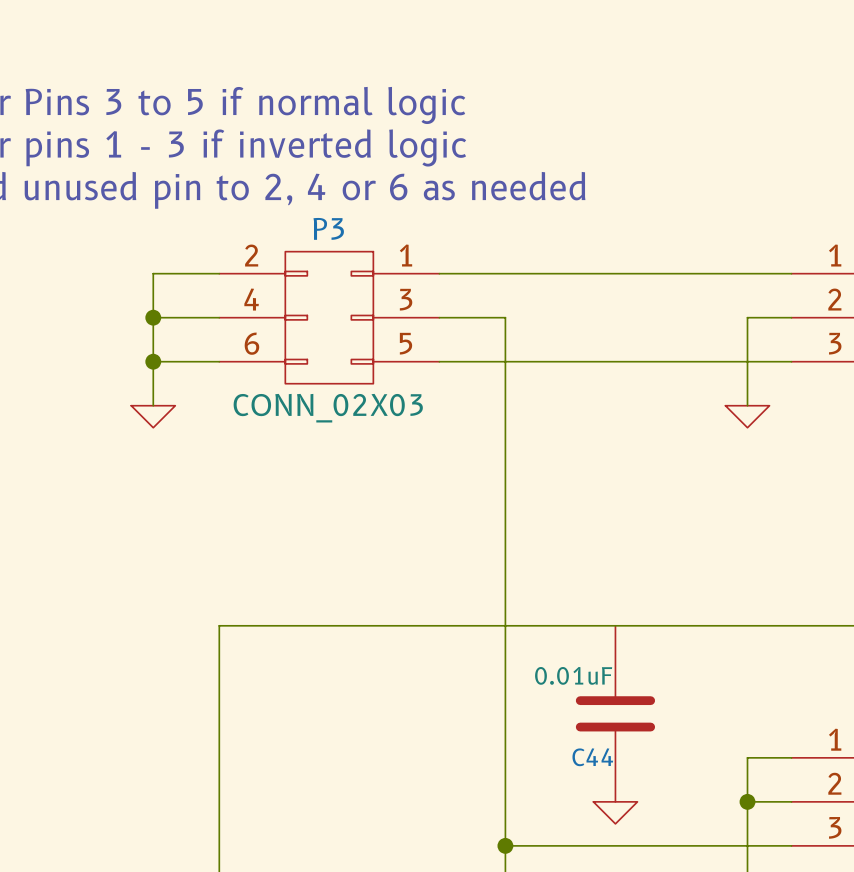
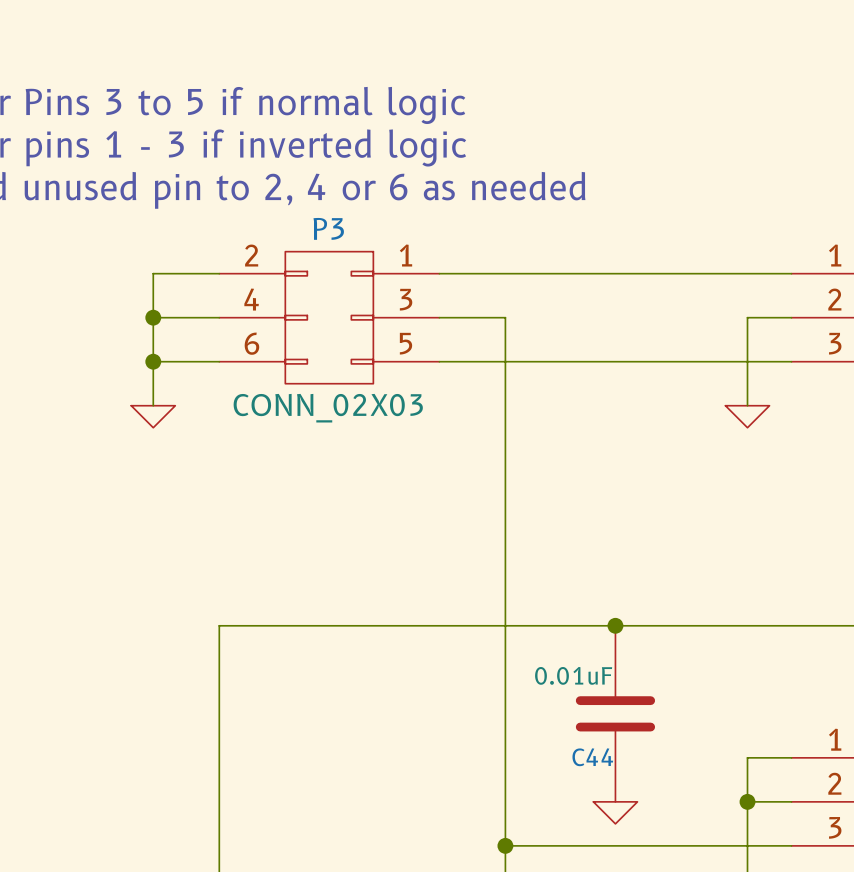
junction: none -> (615, 625)

